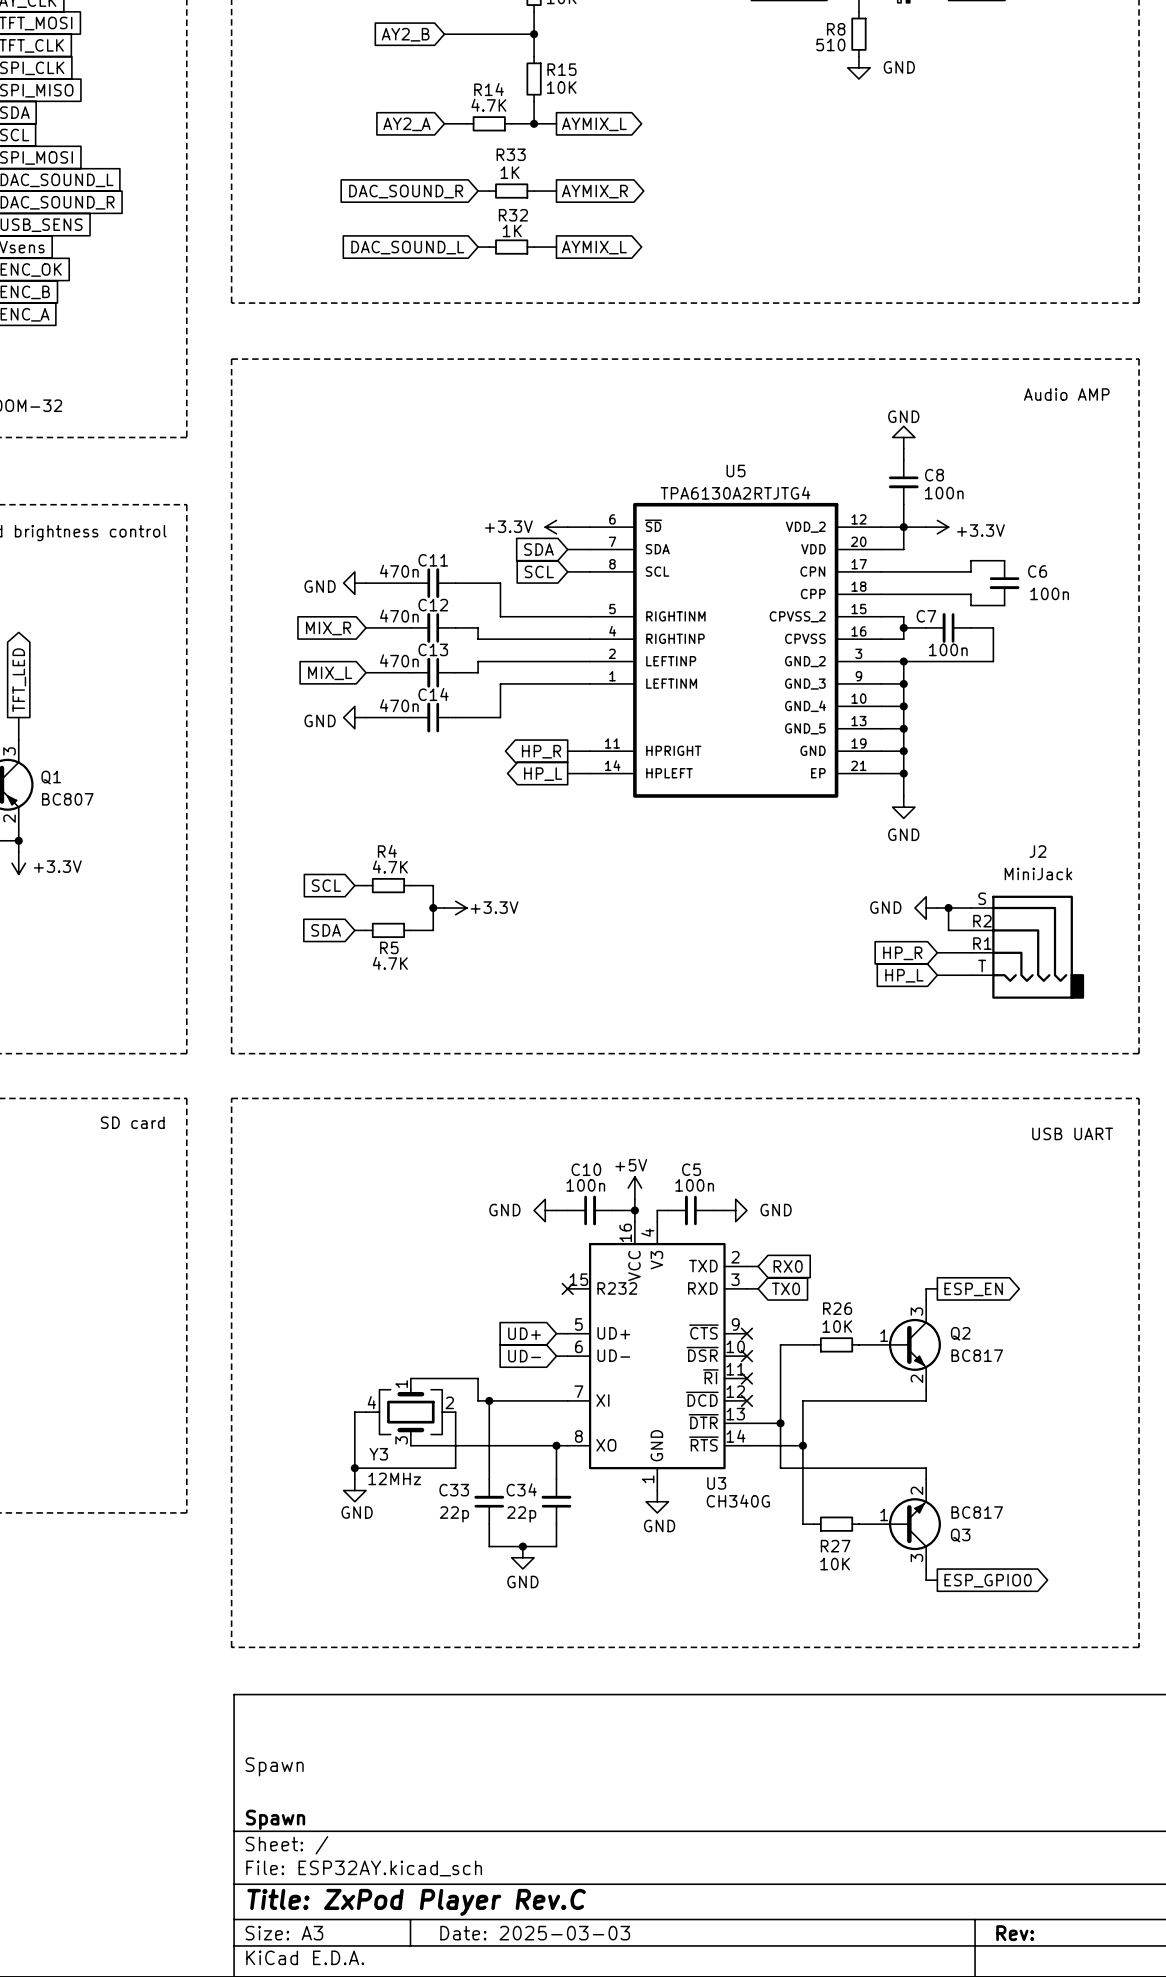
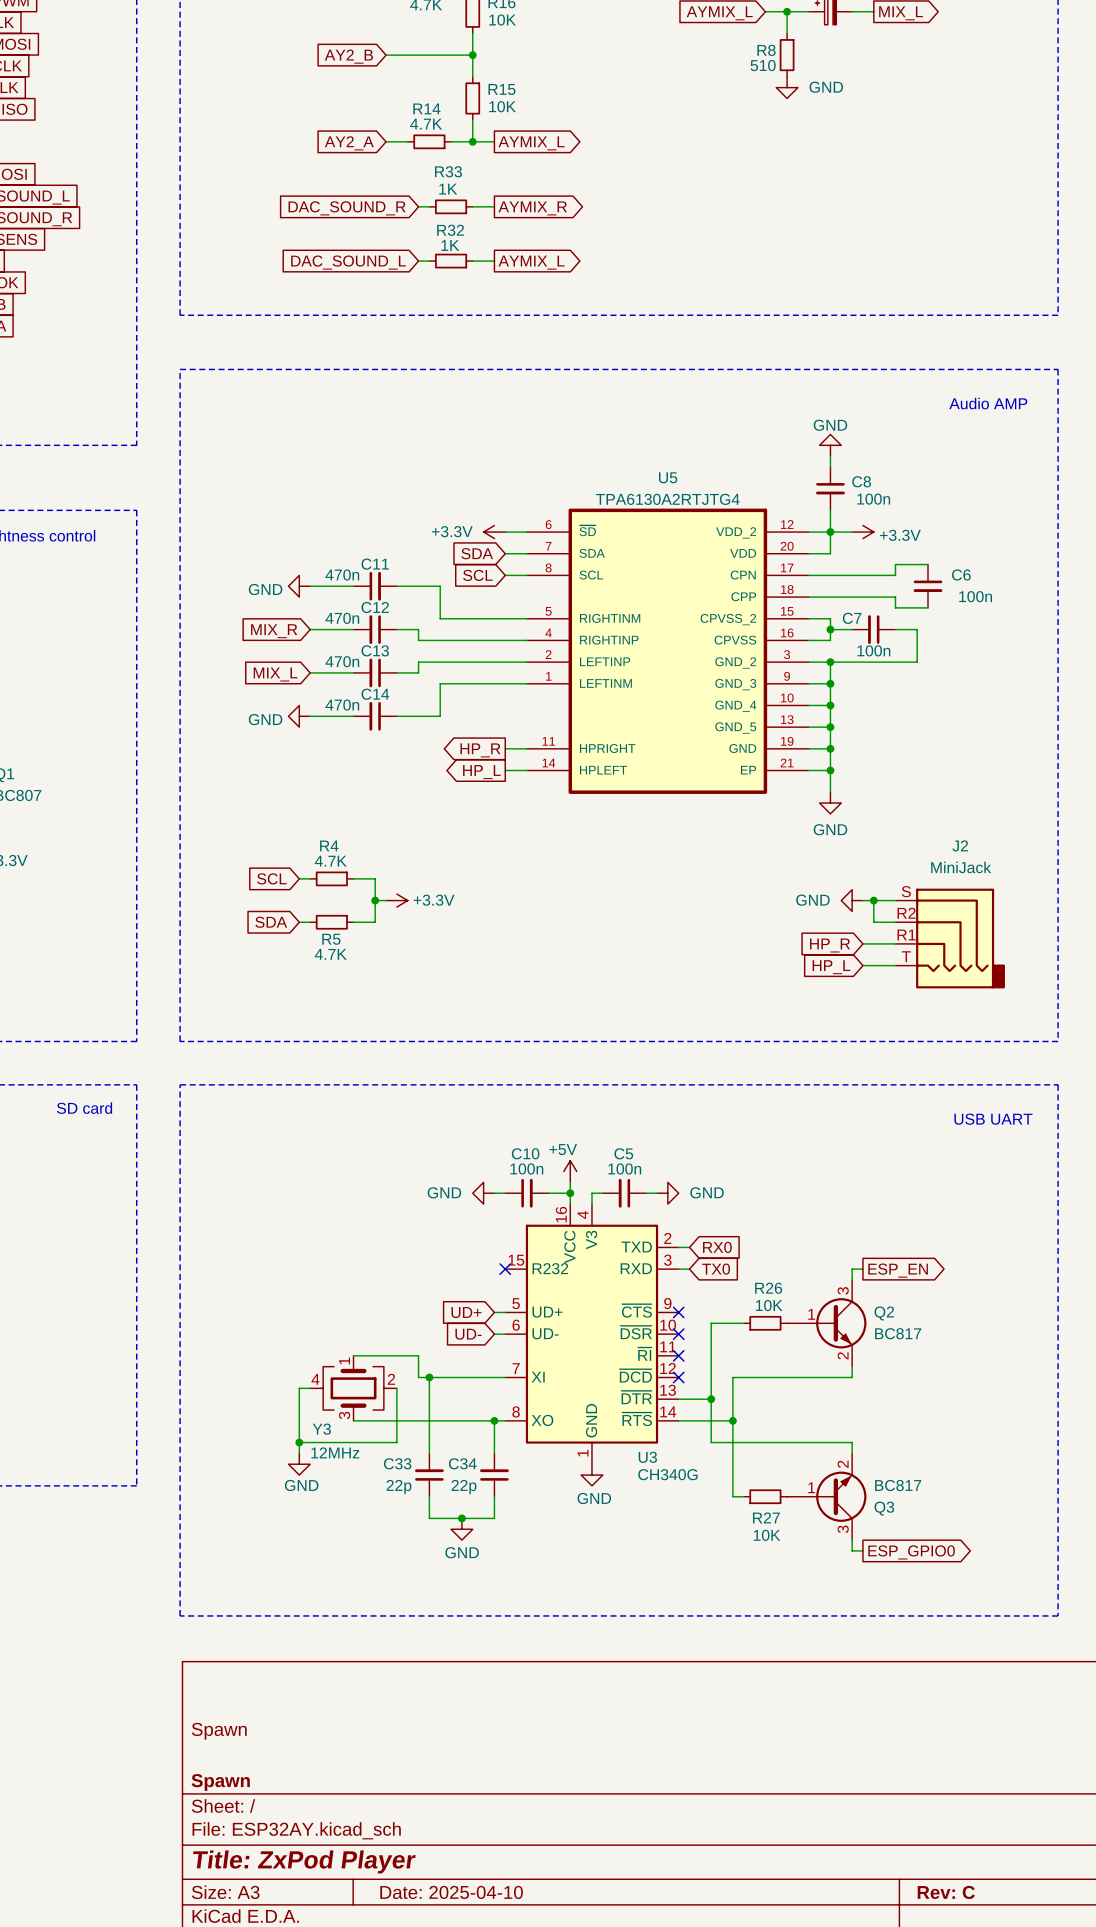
title block: Title: ZxPod Player Rev.C (416, 1902) -> Title: ZxPod Player (304, 1861)
title block: Date: 2025-03-03 (535, 1933) -> Date: 2025-04-10 (451, 1892)
title block: Rev: (1015, 1933) -> Rev: C (946, 1892)

